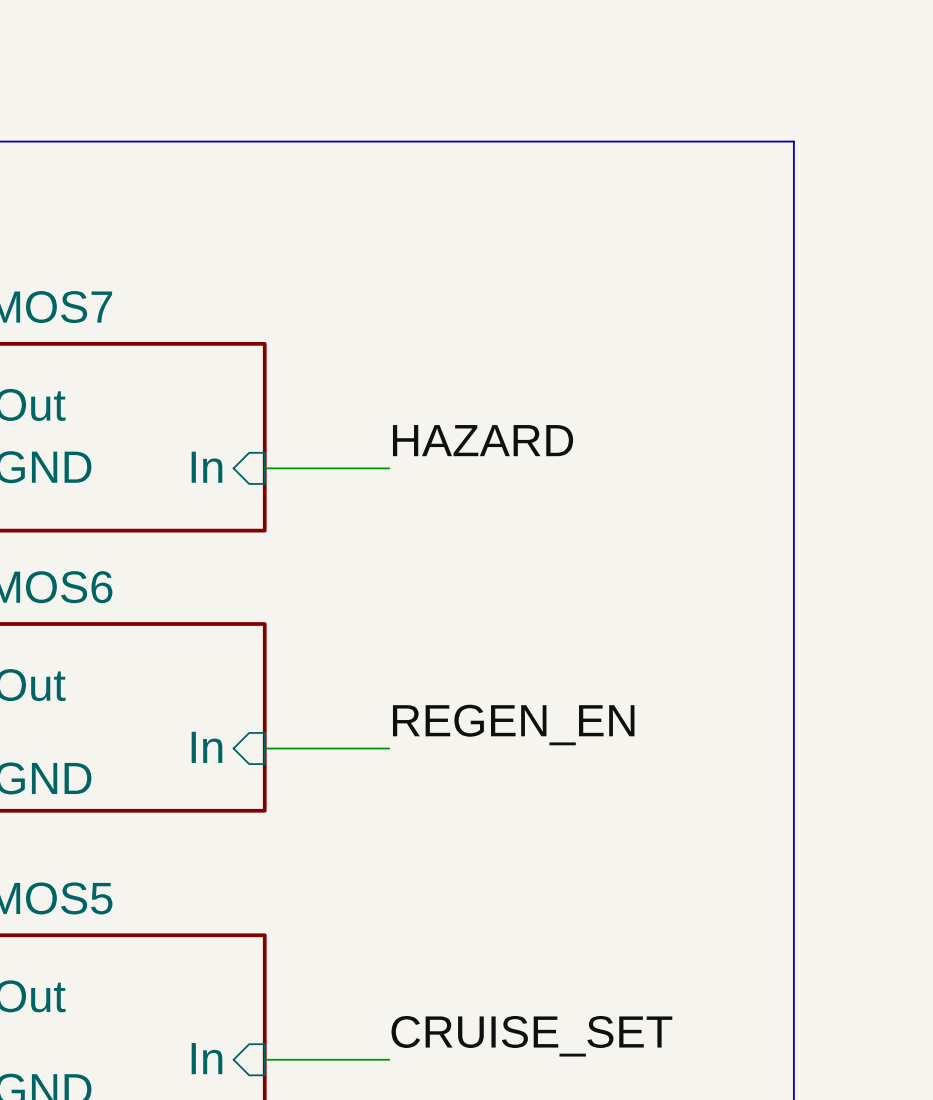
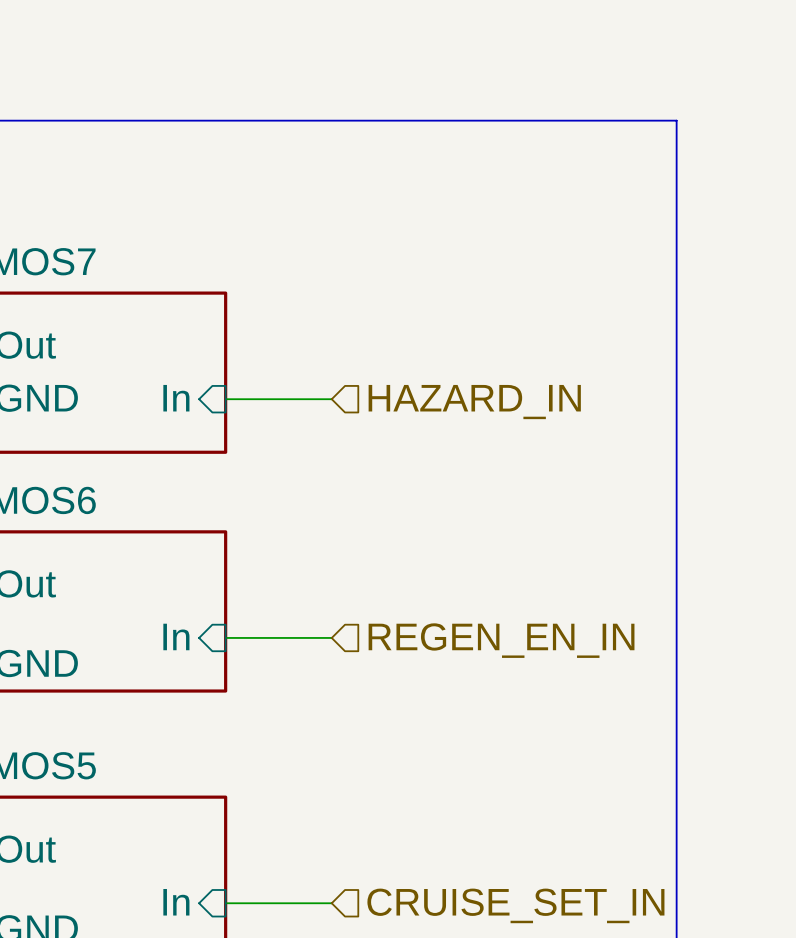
label: HAZARD (483, 440) -> none
hierarchical label: none -> HAZARD_IN (474, 402)
label: REGEN_EN (513, 725) -> none
hierarchical label: none -> REGEN_EN_IN (501, 640)
label: CRUISE_SET (531, 1036) -> none
hierarchical label: none -> CRUISE_SET_IN (515, 905)

